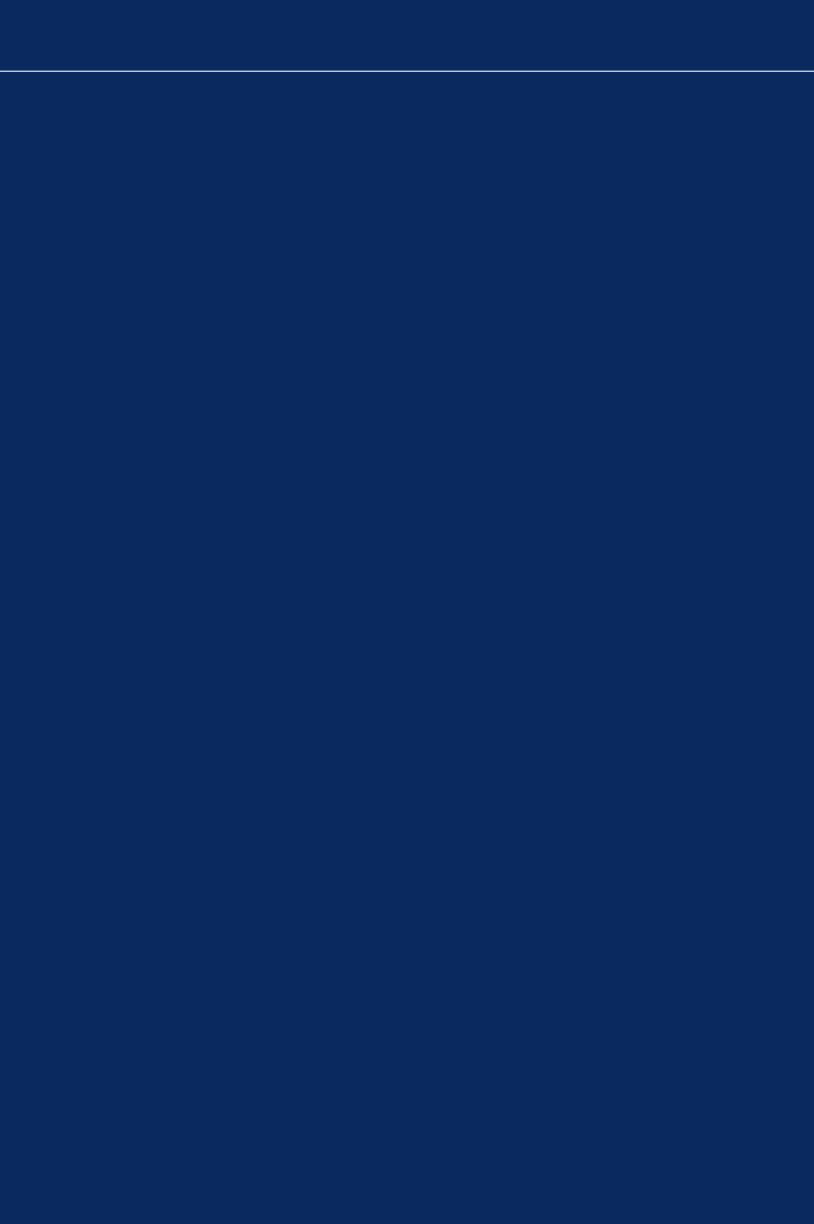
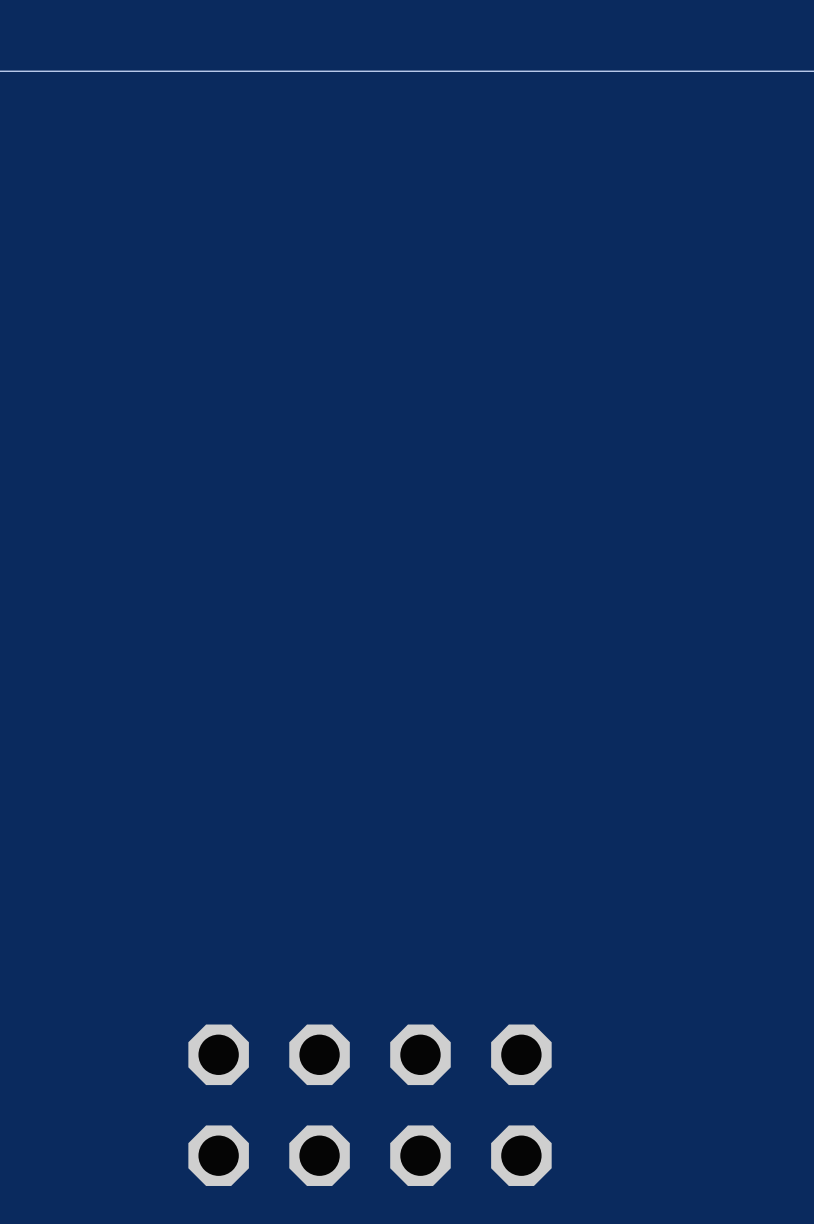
part: none -> (370, 1105)

